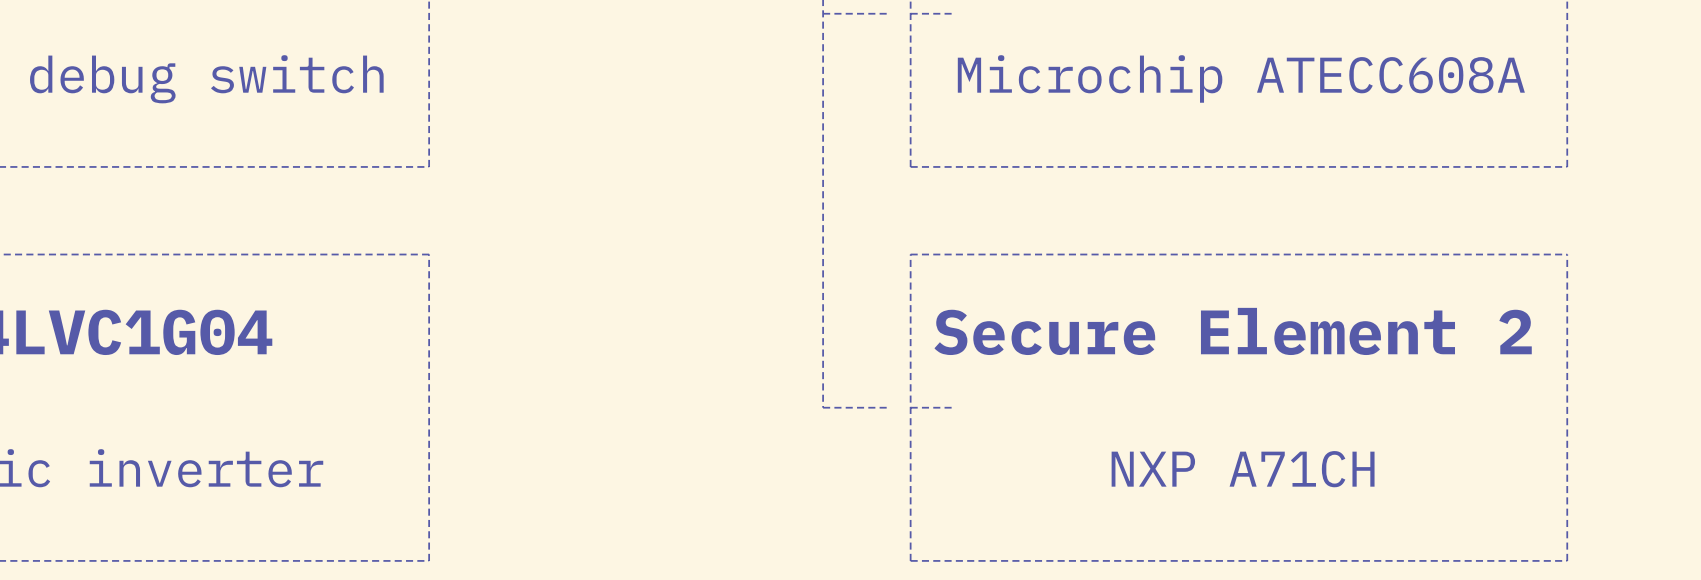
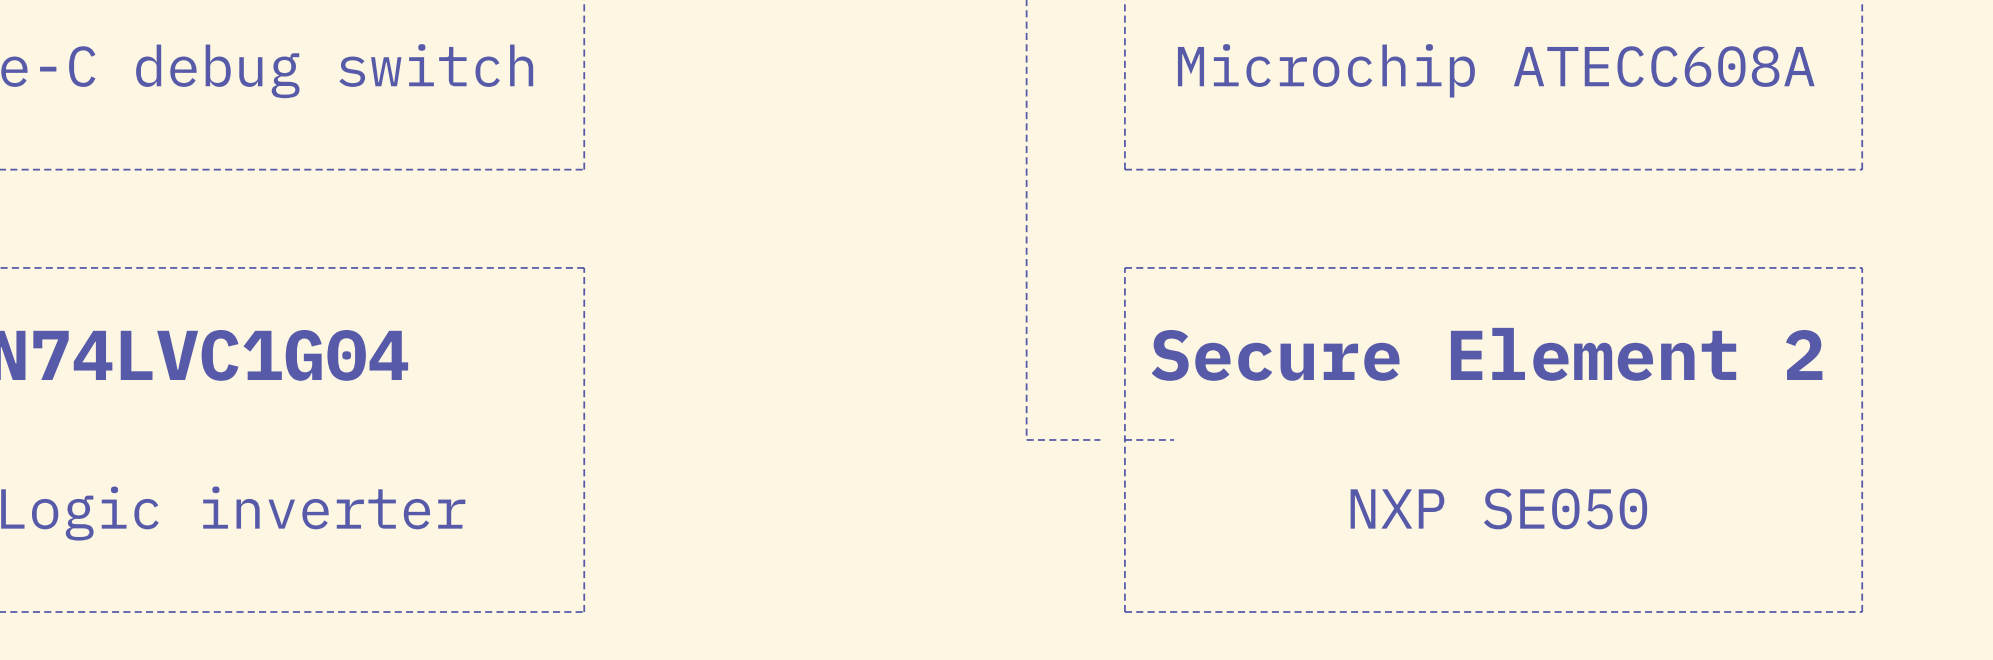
text: NXP A71CH (1243, 469) -> NXP SE050 (1498, 508)

